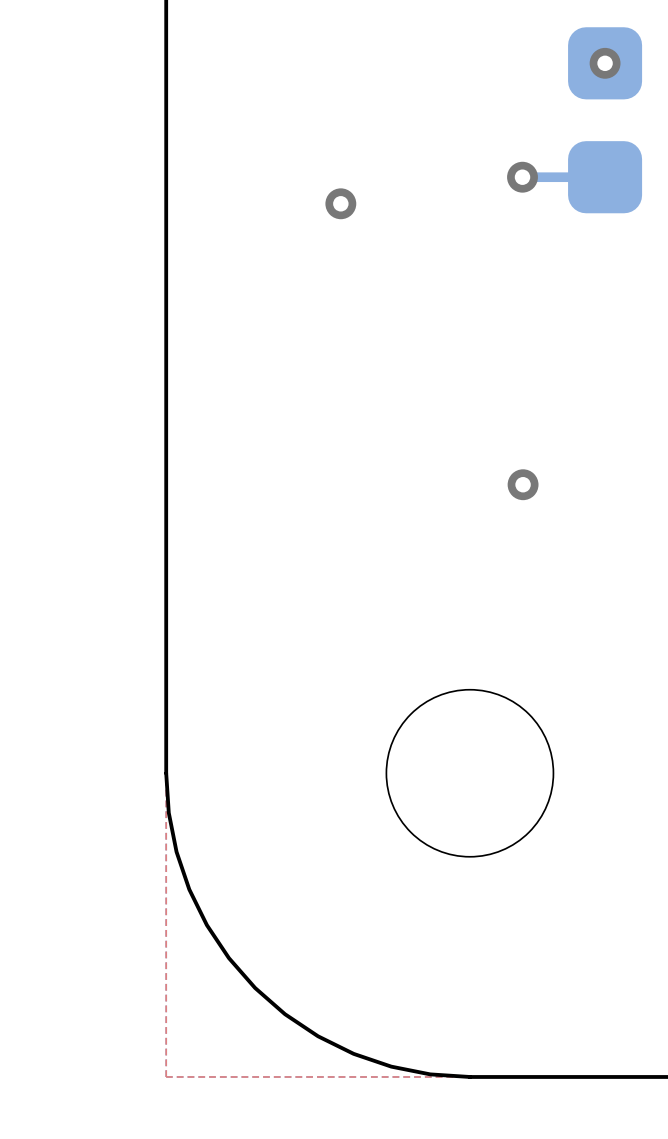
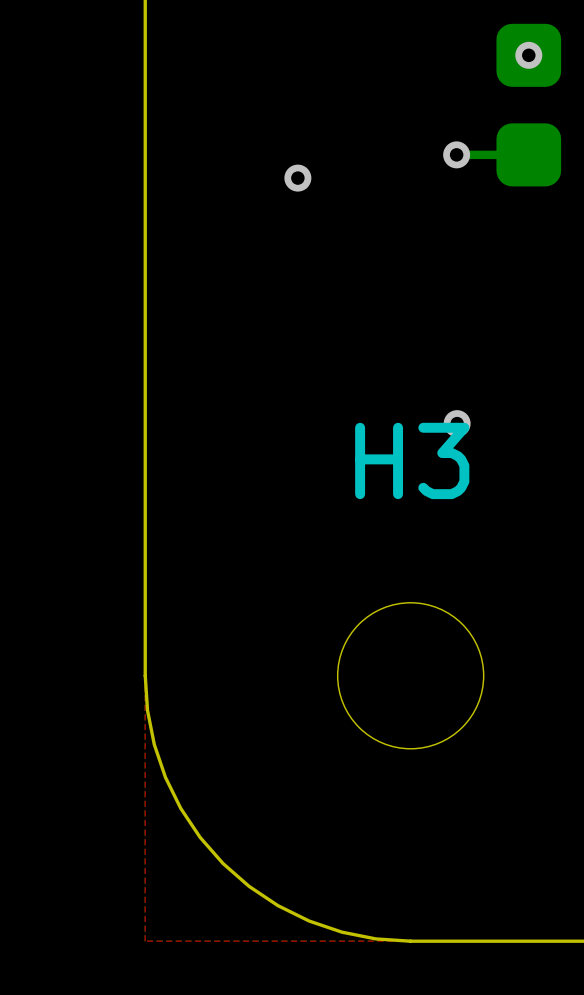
H3 name: none -> H3 (412, 460)

